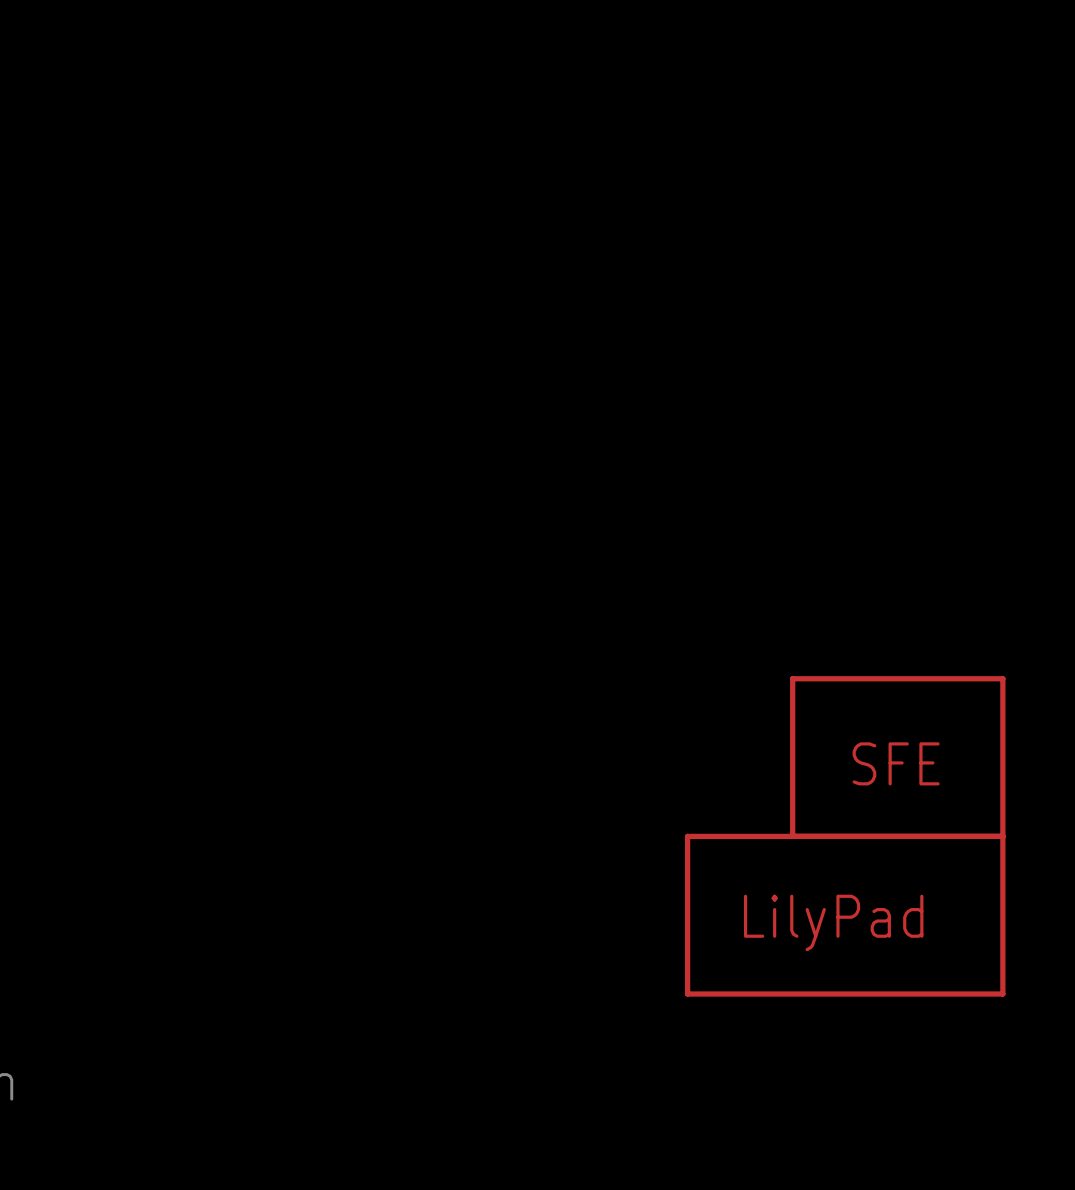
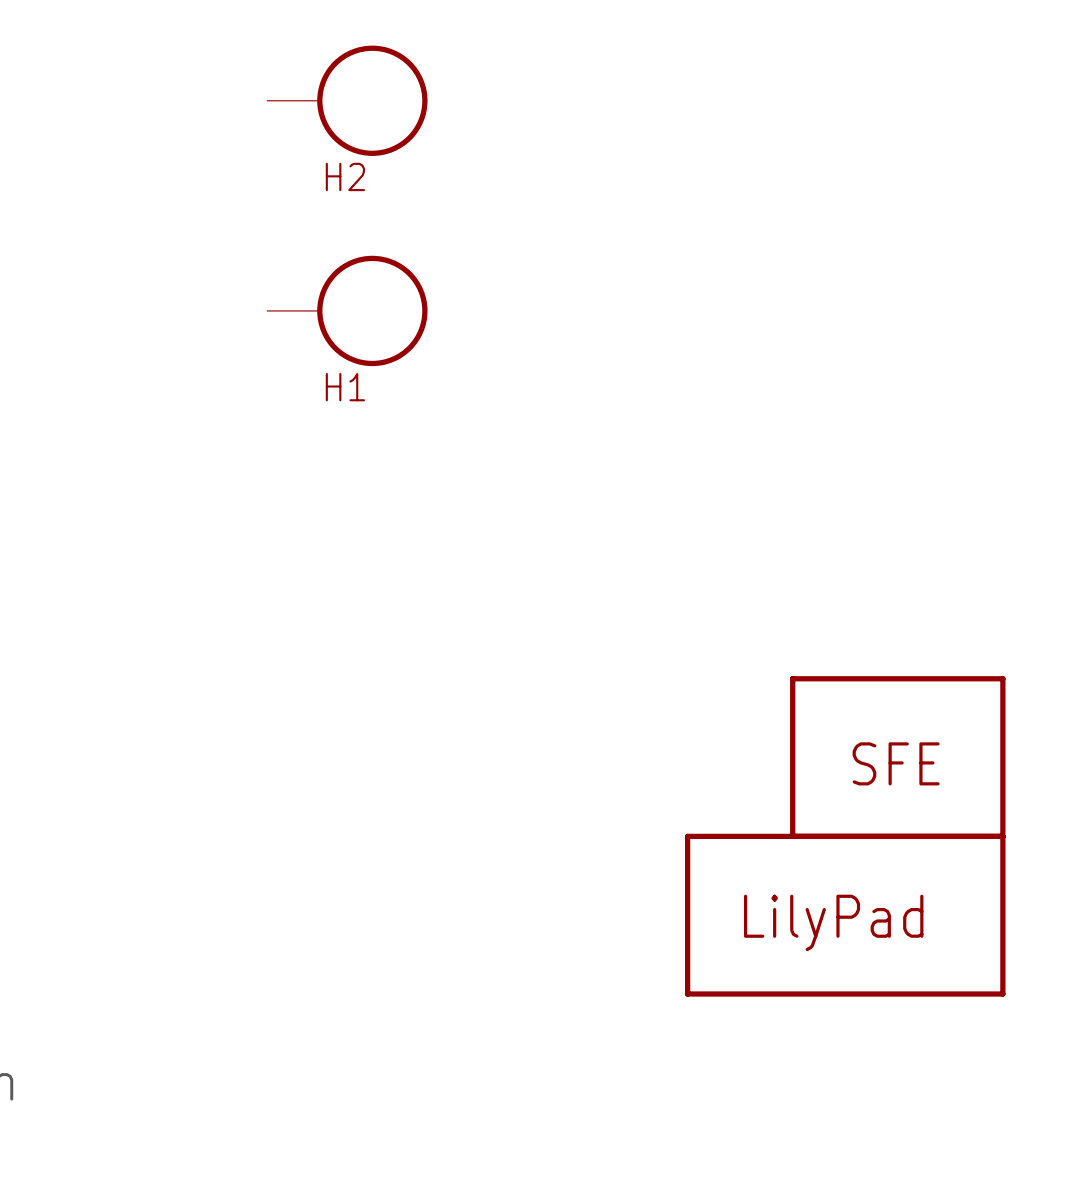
H2: none -> (347, 100)
H1: none -> (347, 310)

